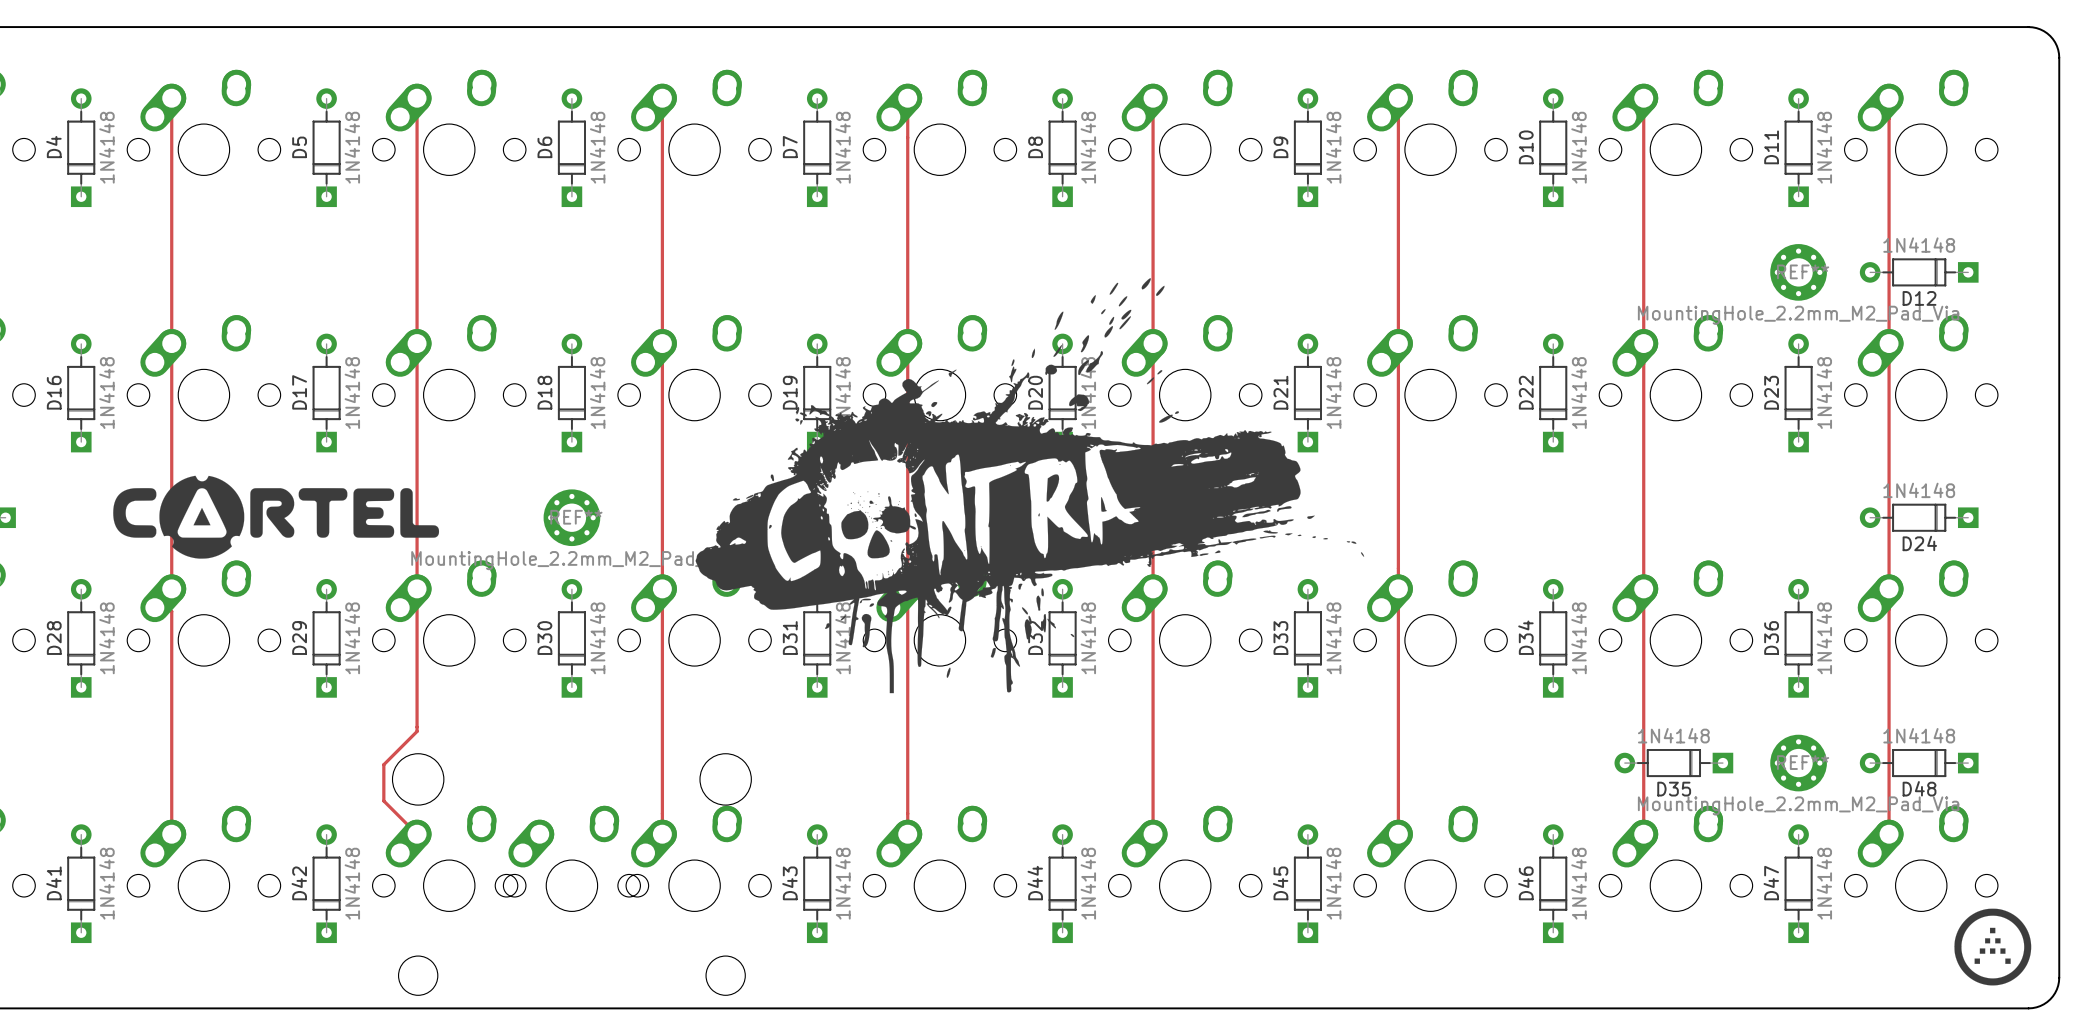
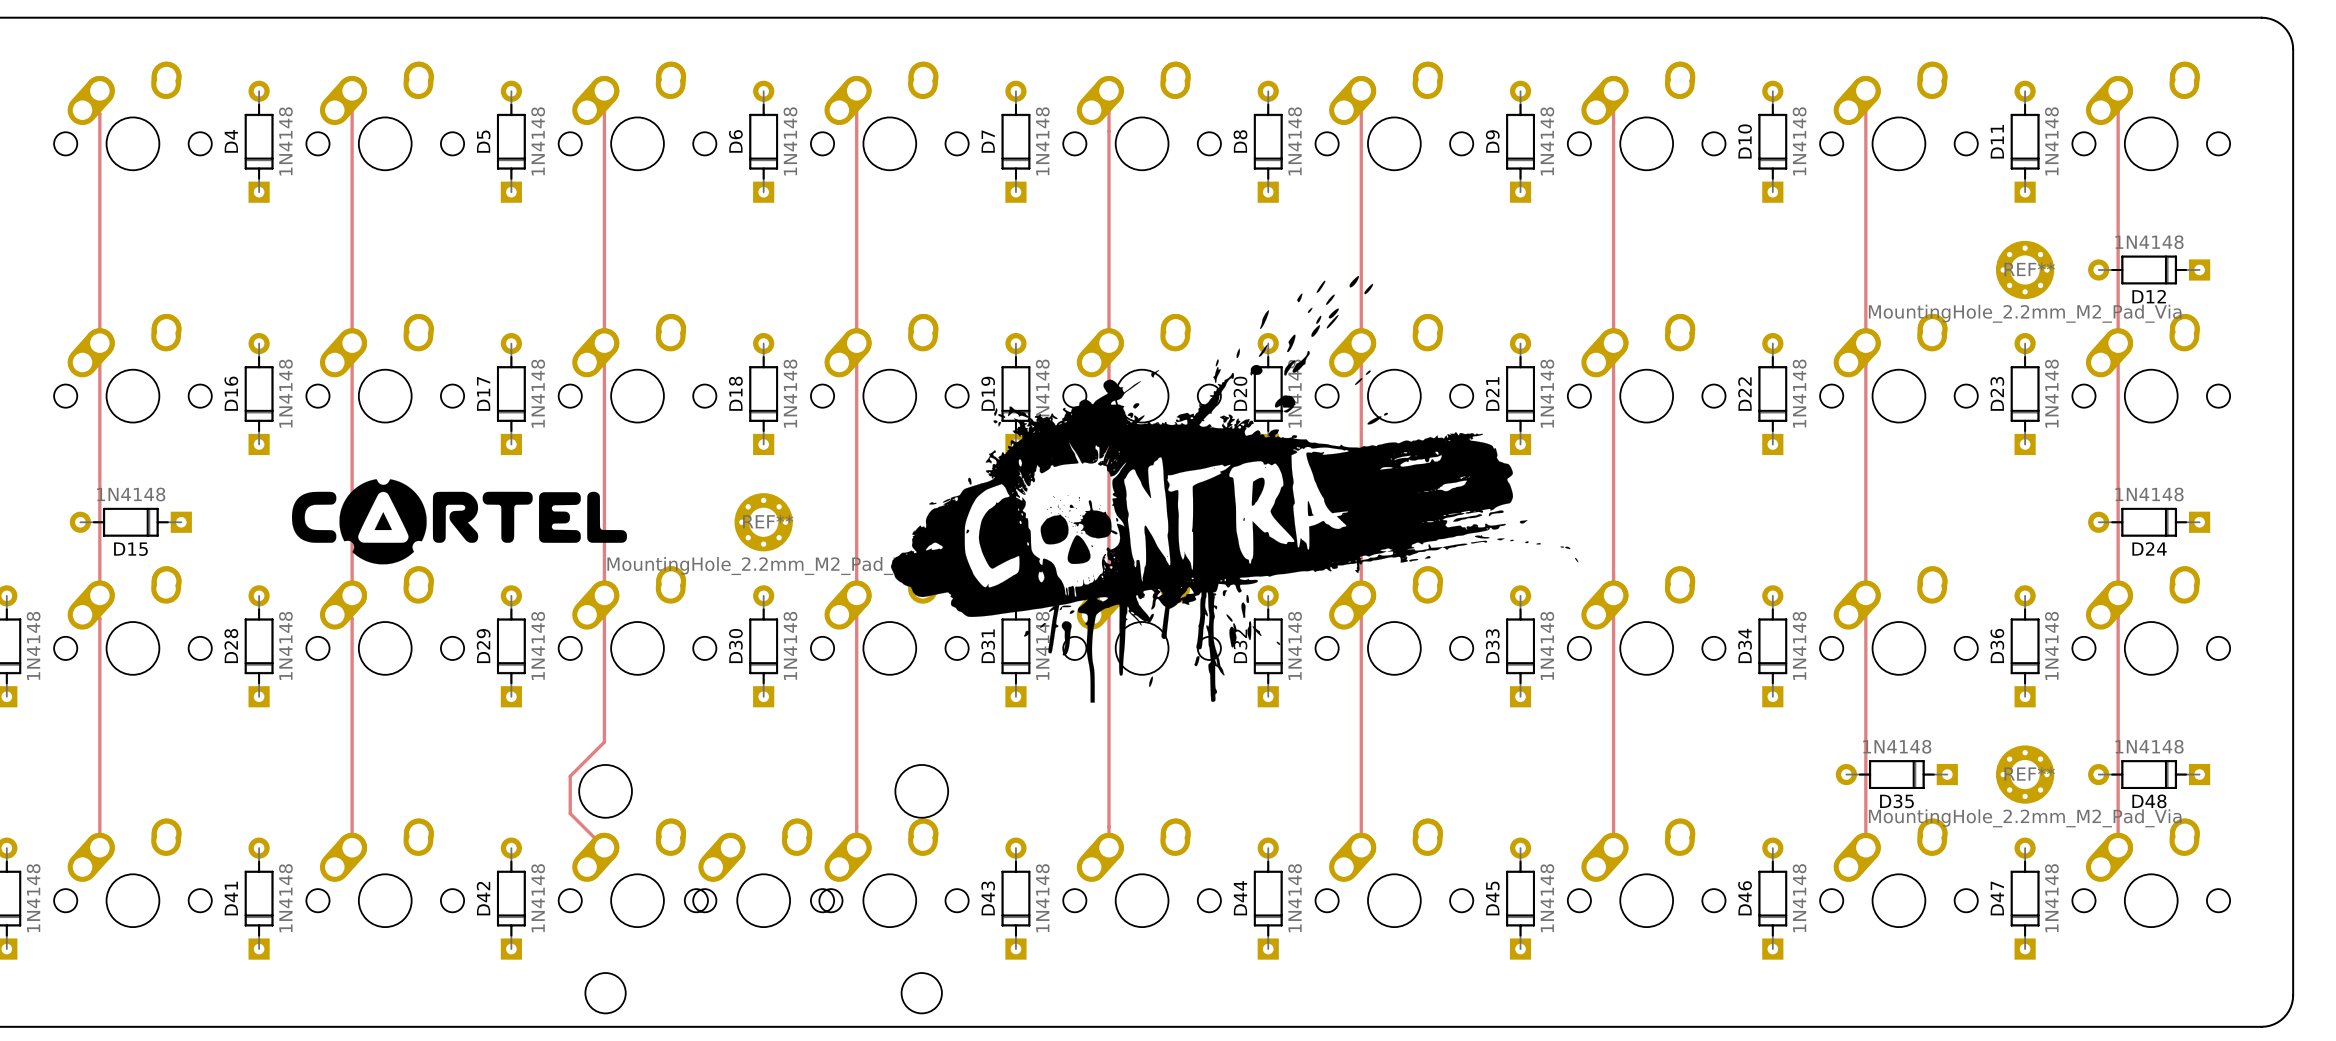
drawing: [1954, 908, 2032, 986] -> none

